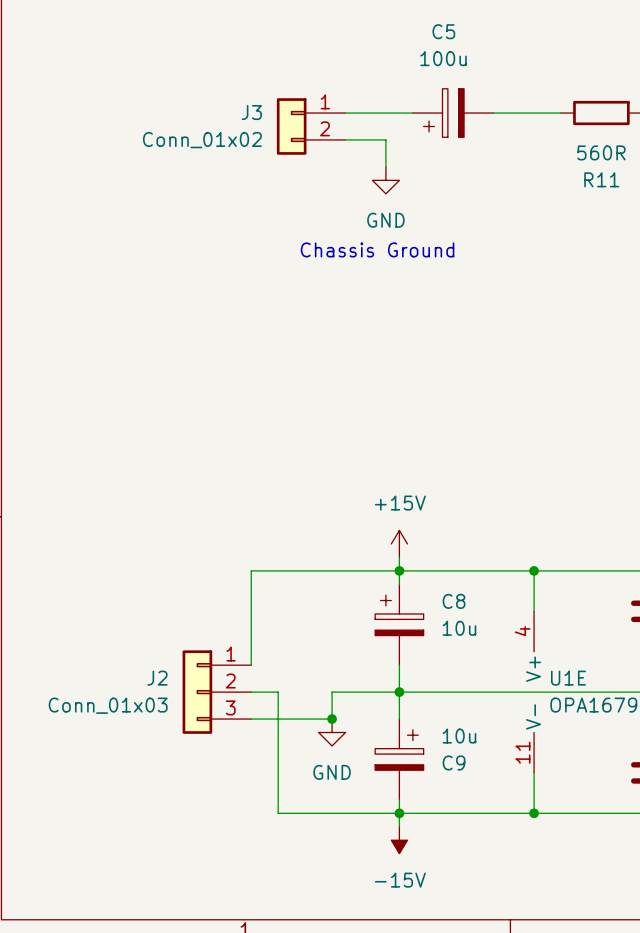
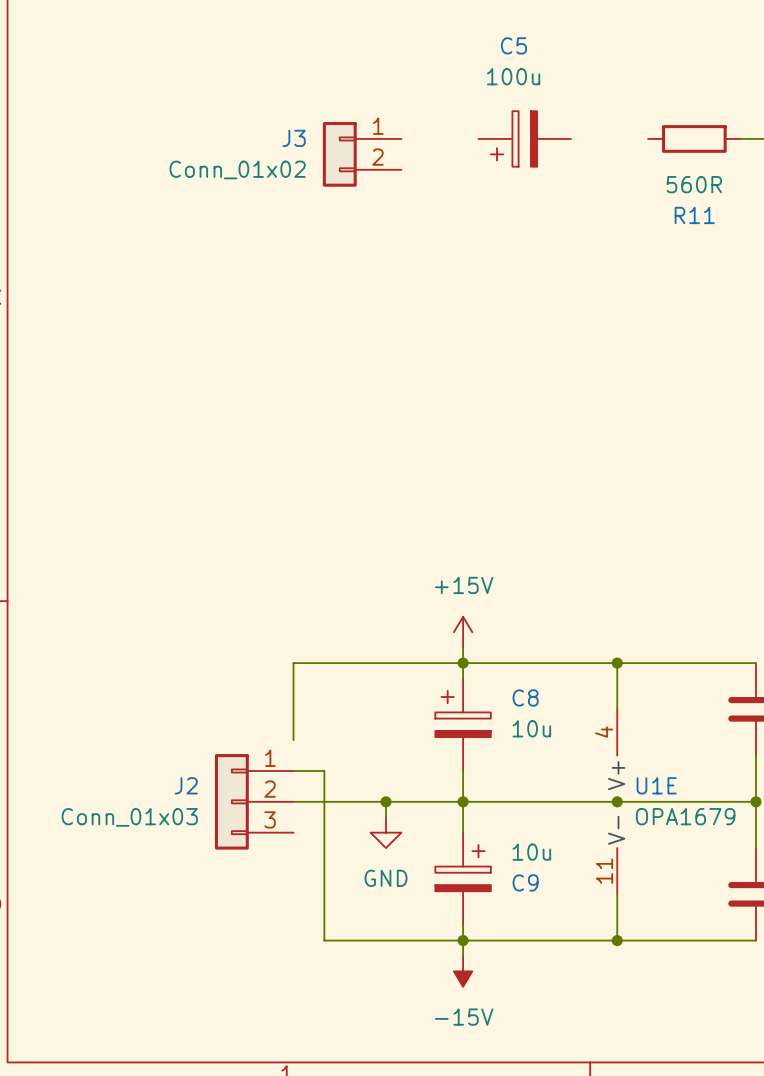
wire: (345, 113) (412, 113) -> none
wire: (493, 113) (561, 113) -> none
wire: (345, 139) (385, 139) (385, 166) -> none
power symbol: GND (385, 180) -> none
text: Chassis Ground (377, 249) -> none
wire: (251, 638) (251, 665) -> (386, 801) (324, 801) (324, 771) (293, 771)
junction: none -> (617, 801)
wire: (332, 705) (332, 719) (251, 719) -> none
junction position: (332, 719) -> (386, 801)
power symbol position: GND (332, 732) -> GND (386, 832)

